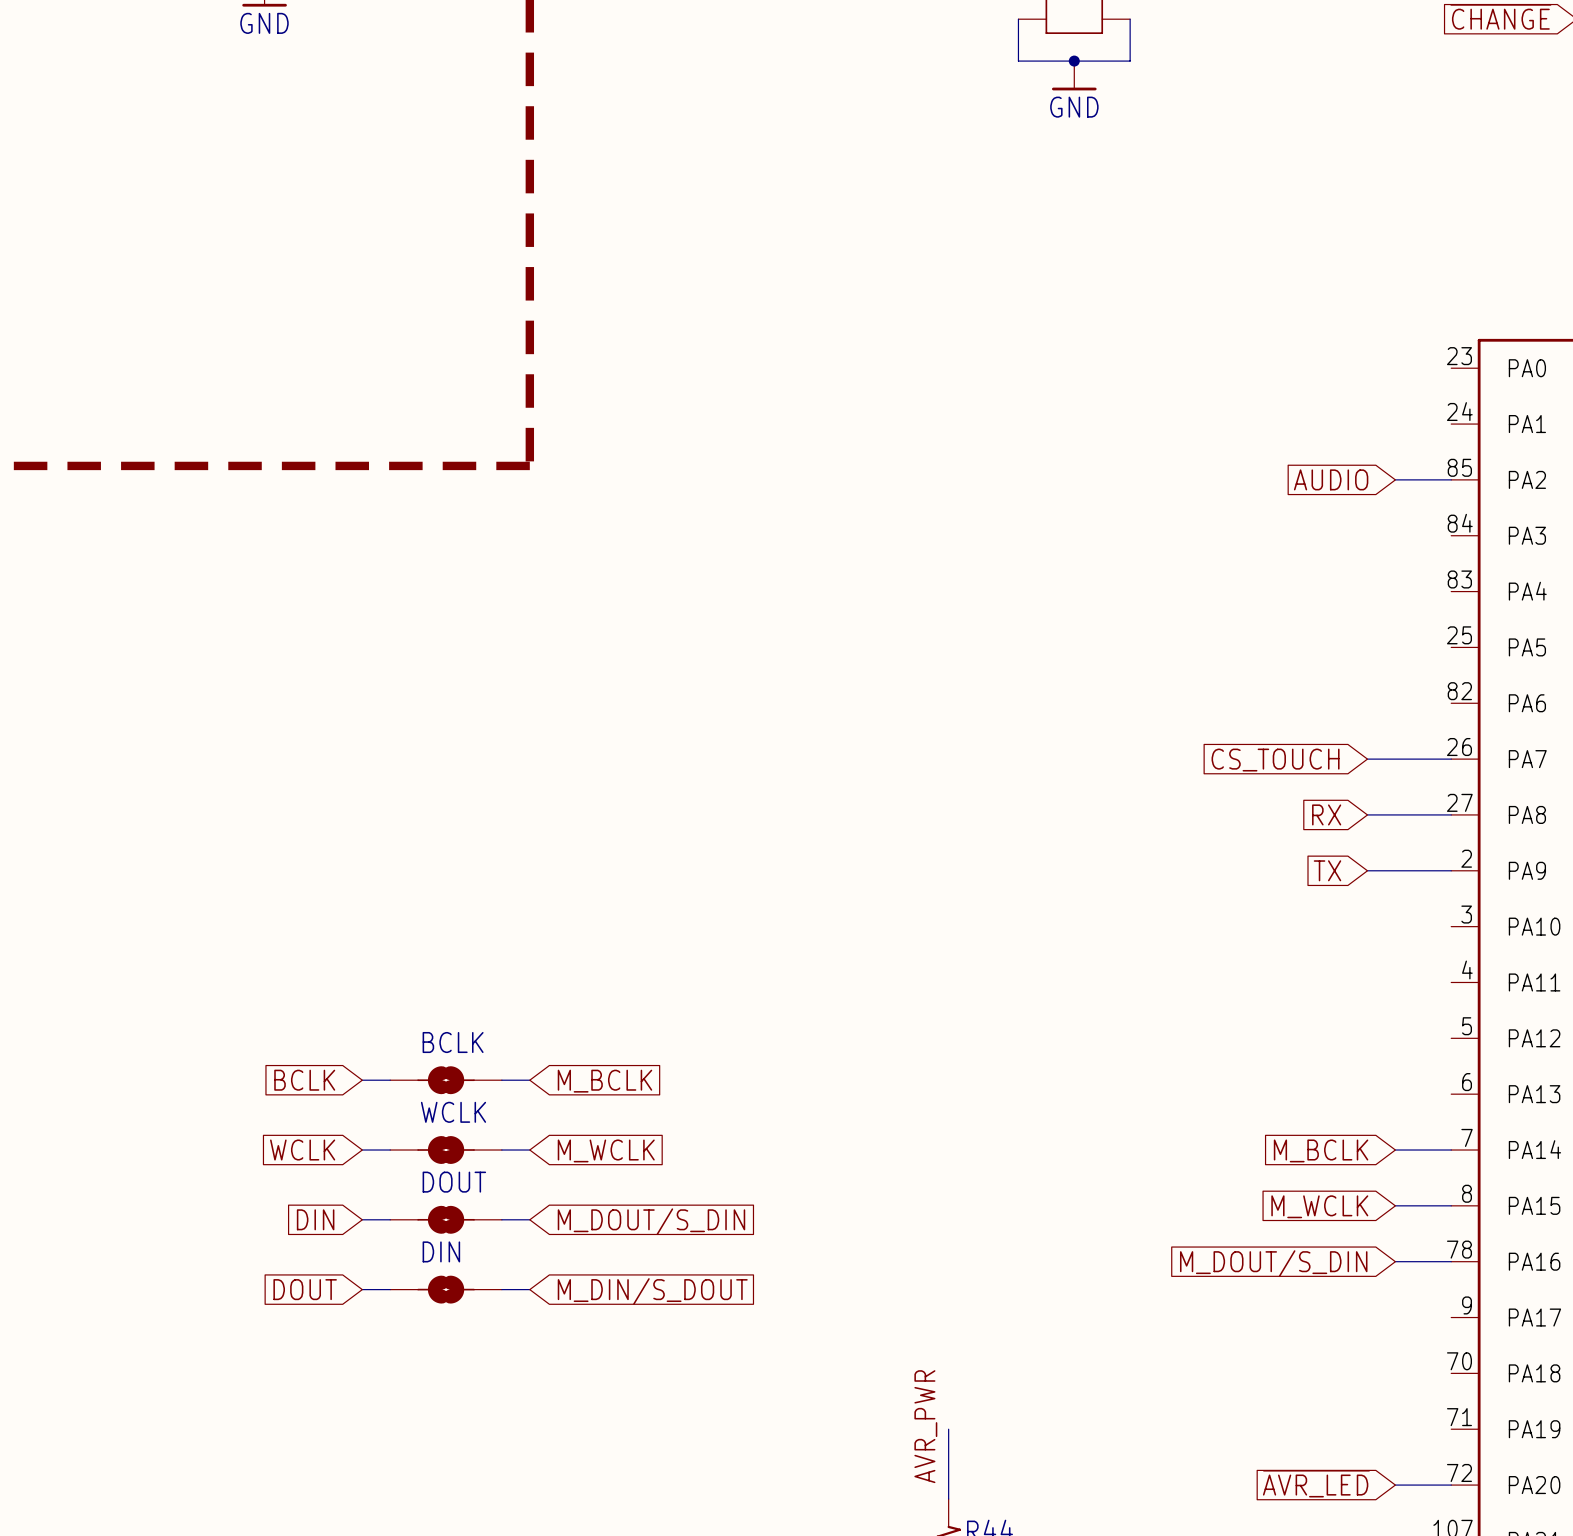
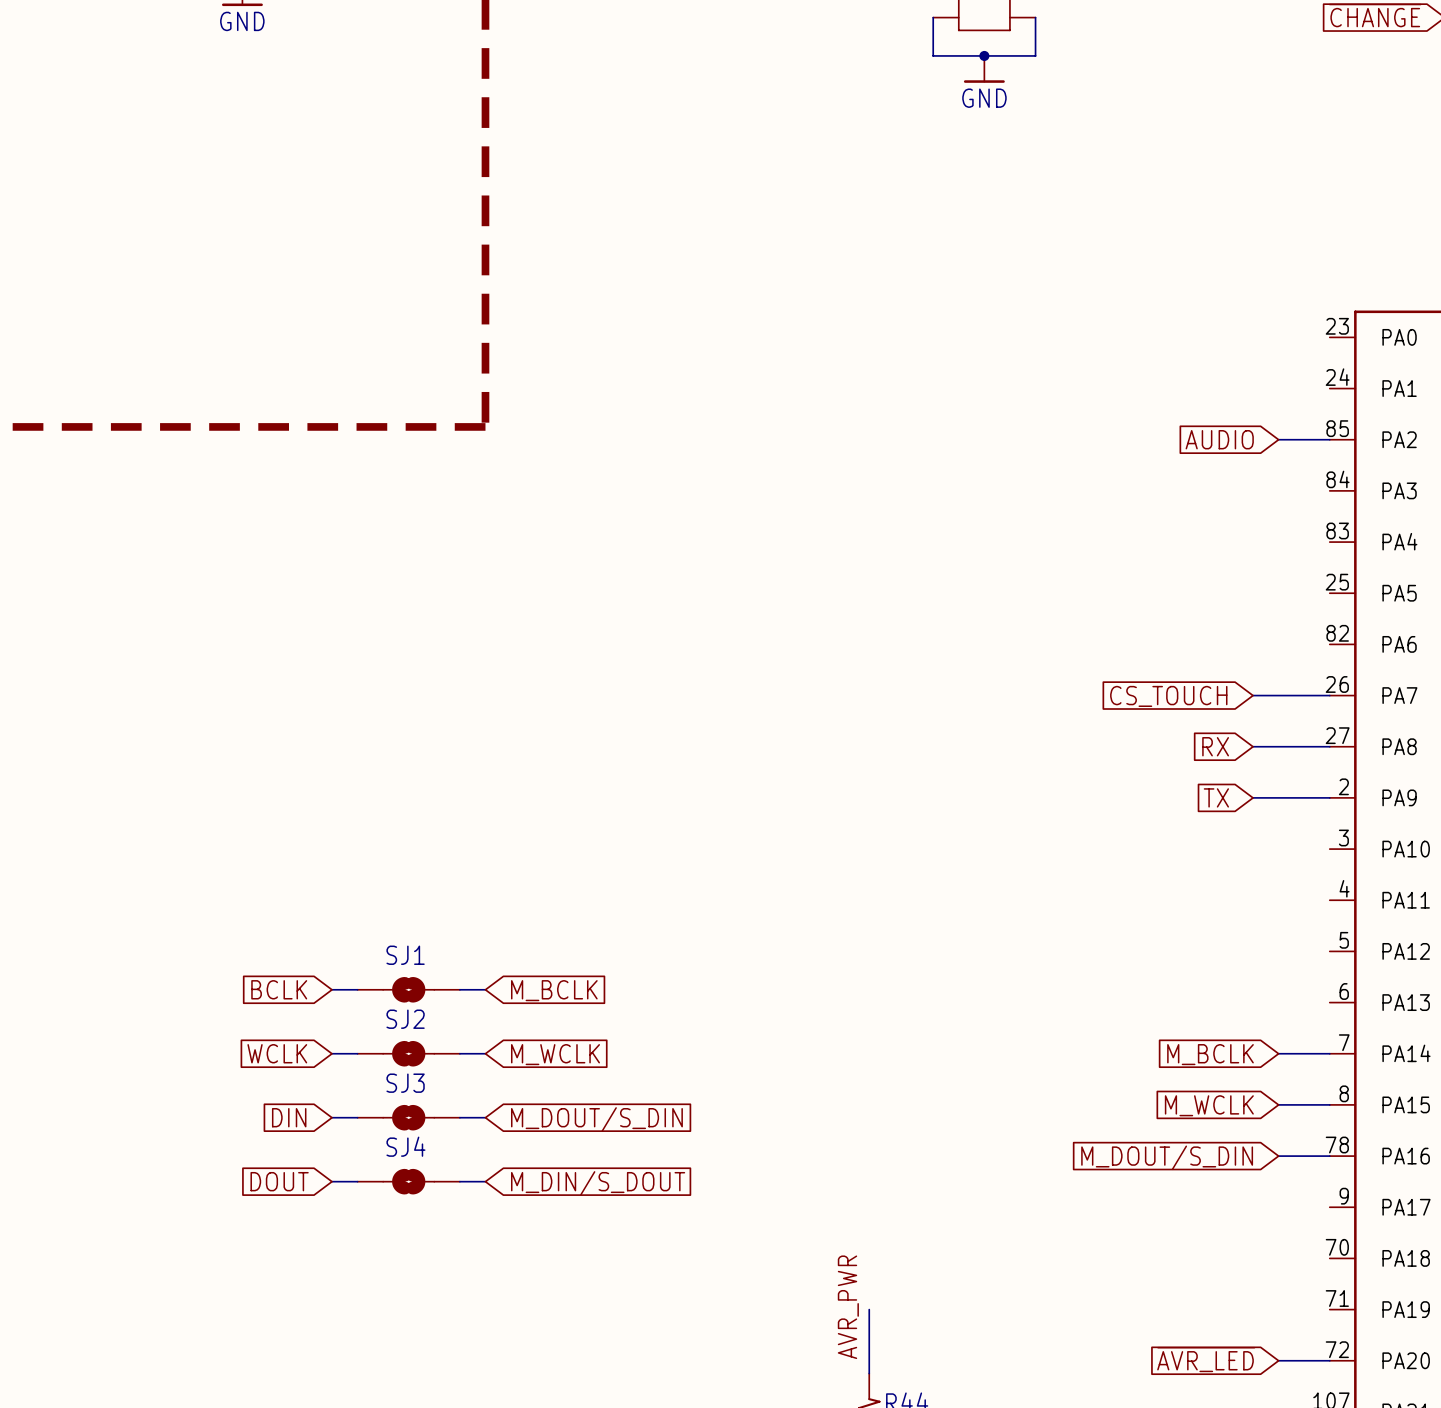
BCLK name: BCLK (453, 1042) -> SJ1 (405, 955)
WCLK name: WCLK (453, 1112) -> SJ2 (405, 1019)
DOUT name: DOUT (454, 1182) -> SJ3 (405, 1083)
DIN name: DIN (441, 1251) -> SJ4 (405, 1146)

